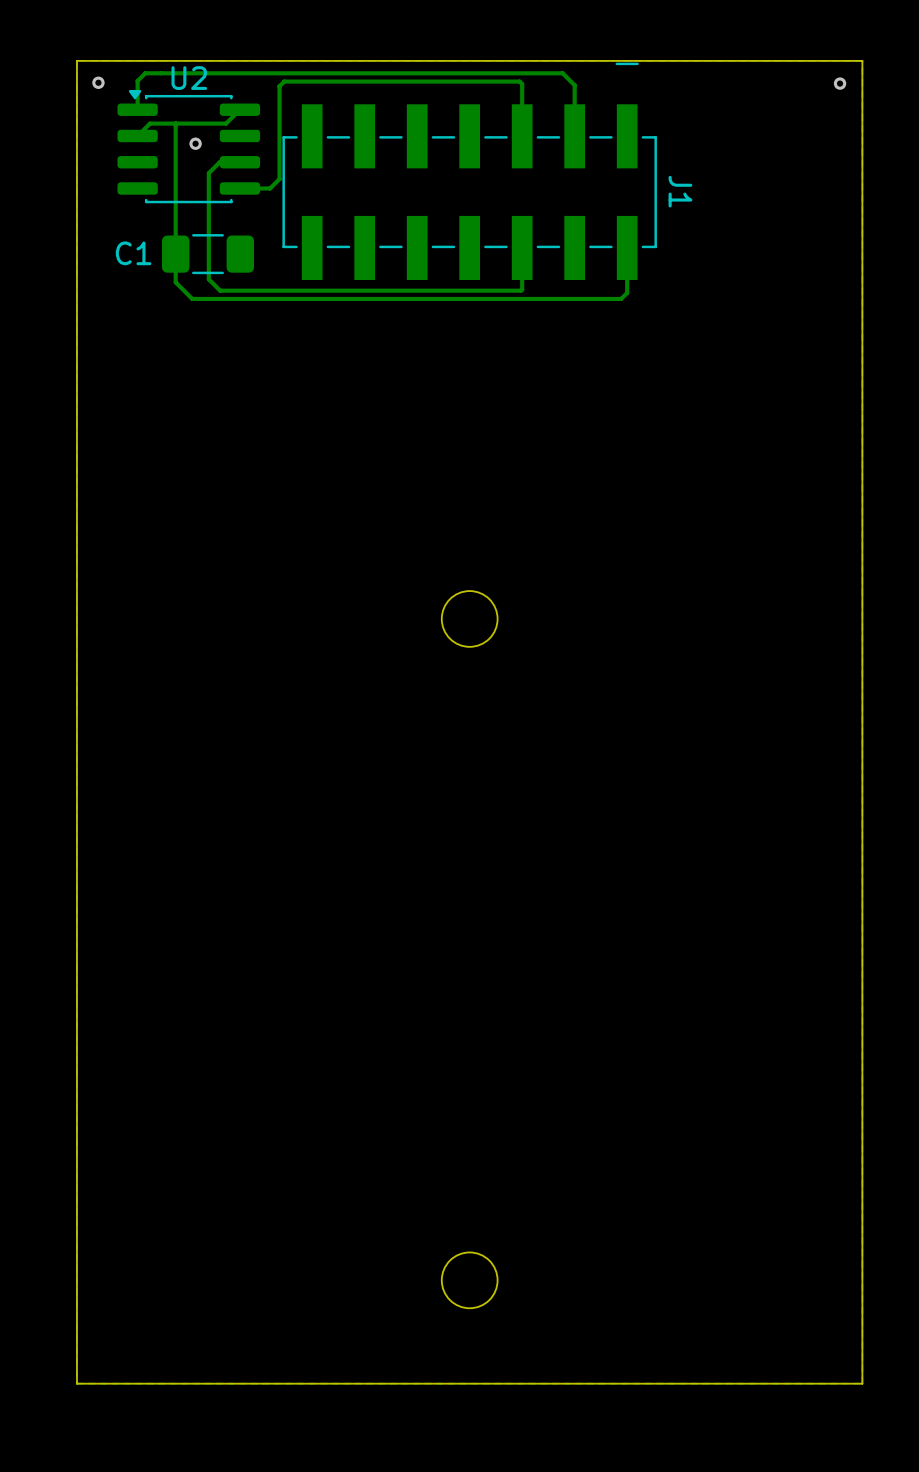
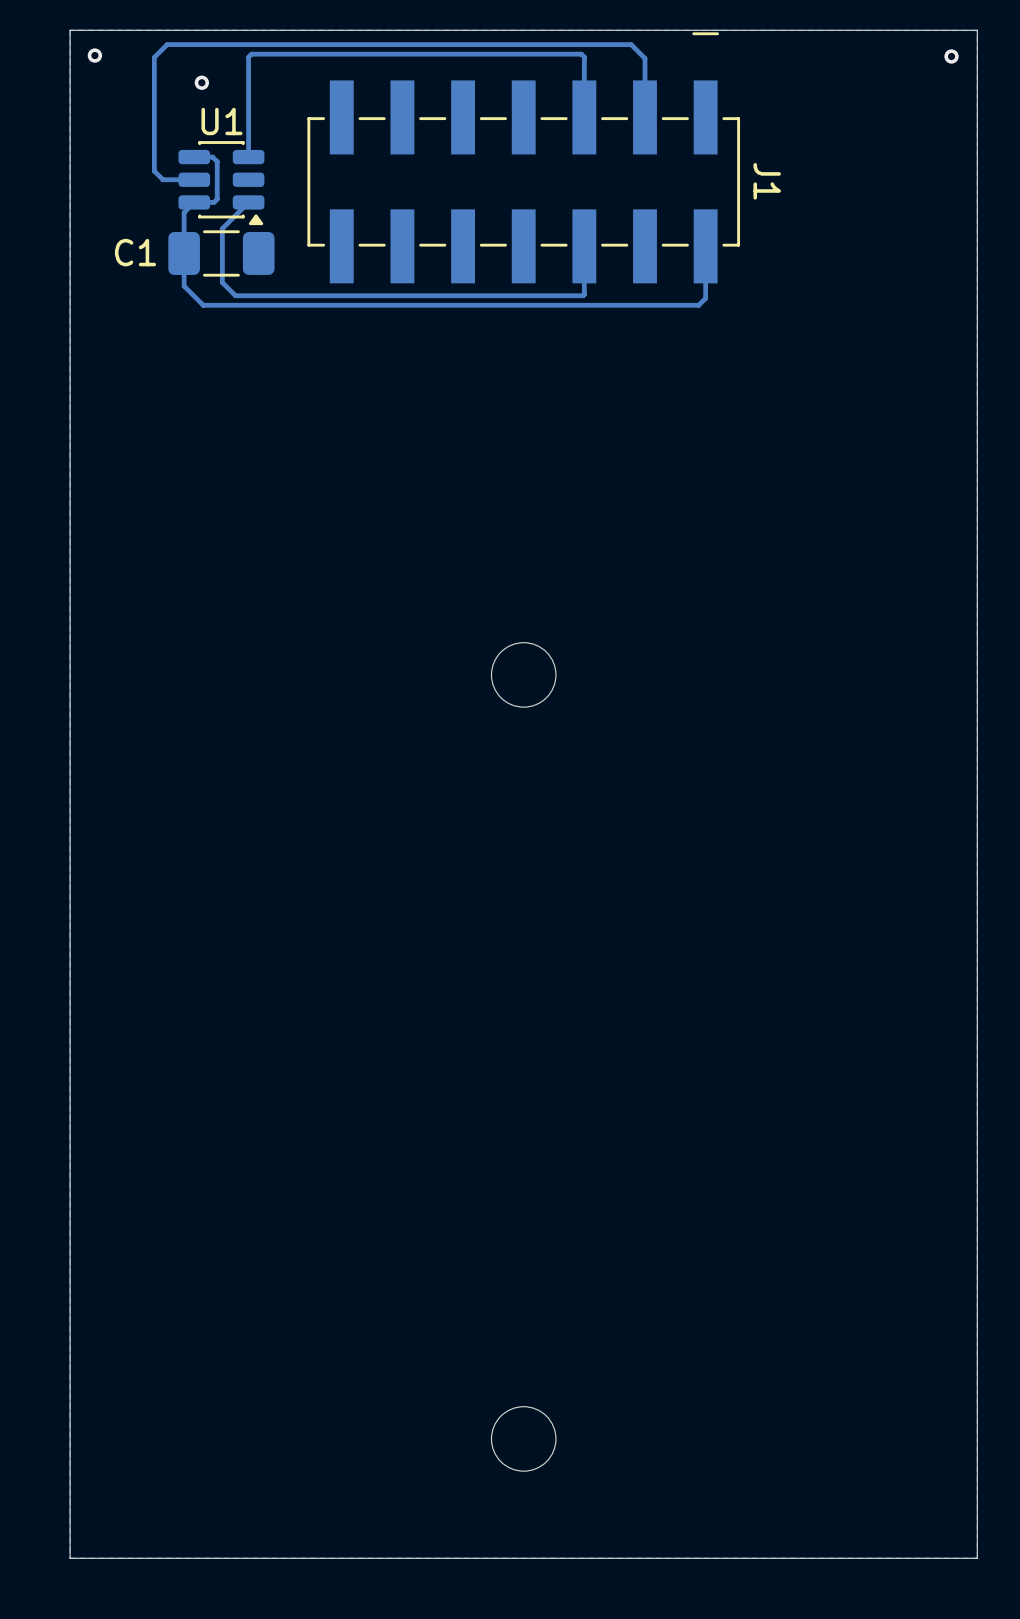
track: (161, 73) (145, 73) (137, 81) (137, 109) -> (167, 44) (154, 57) (154, 171) (163, 179) (194, 179)
track: (284, 81) (279, 86) (279, 179) (270, 188) (239, 188) -> (309, 54) (251, 54) (248, 57) (248, 157)
track: (239, 109) (226, 123) (150, 123) (137, 135) -> none
track: (175, 123) (175, 218) -> (194, 157) (212, 157) (217, 161) (217, 199) (213, 202) (194, 202) (184, 212)
via position: (195, 143) -> (201, 82)
U2: (188, 146) -> none
track: (239, 162) (219, 162) (208, 173) (208, 232) -> (248, 202) (222, 228)
U1: none -> (221, 183)

